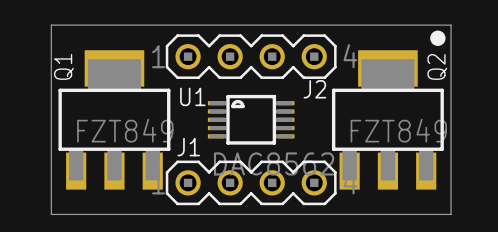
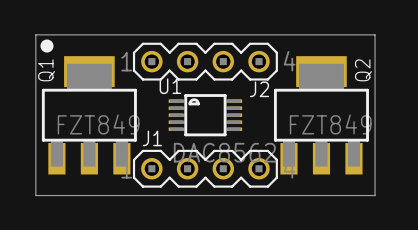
drawing position: (437, 38) -> (46, 46)
drawing position: (437, 38) -> (46, 46)
U1 name position: U1 (192, 96) -> U1 (170, 86)

